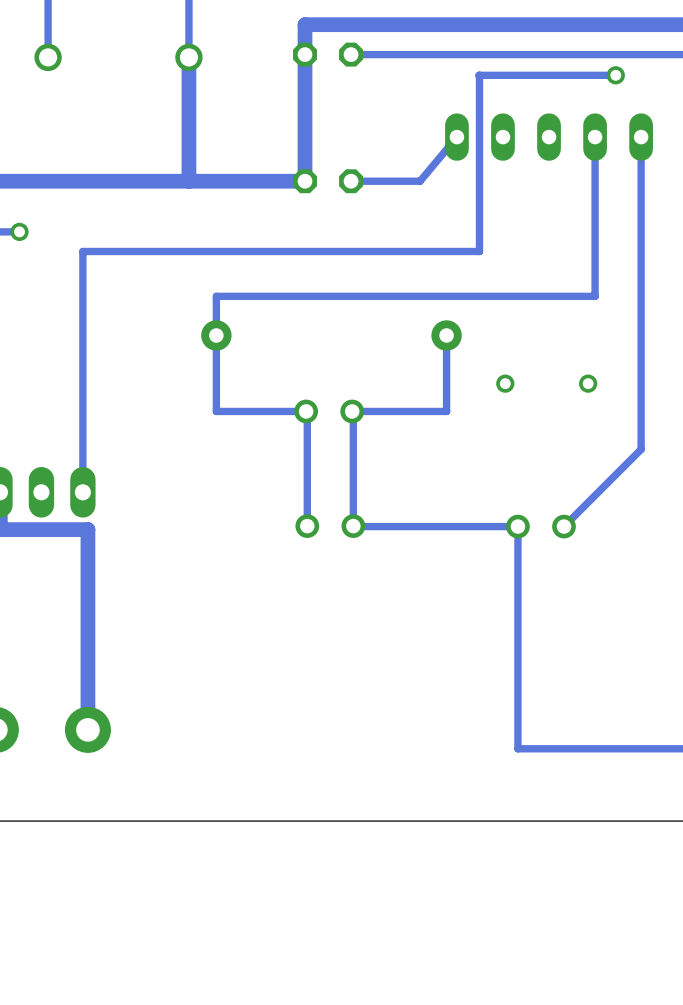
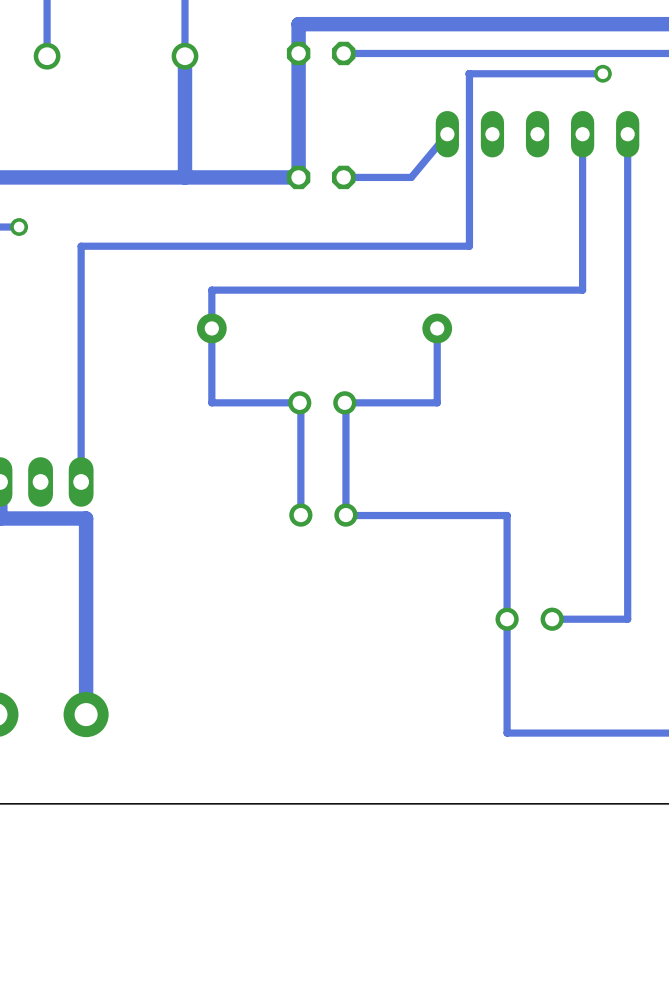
via: (505, 383) -> none
via: (588, 383) -> none
track: (641, 449) (564, 526) -> (627, 440) (627, 619) (552, 619)
part position: (540, 526) -> (529, 619)

